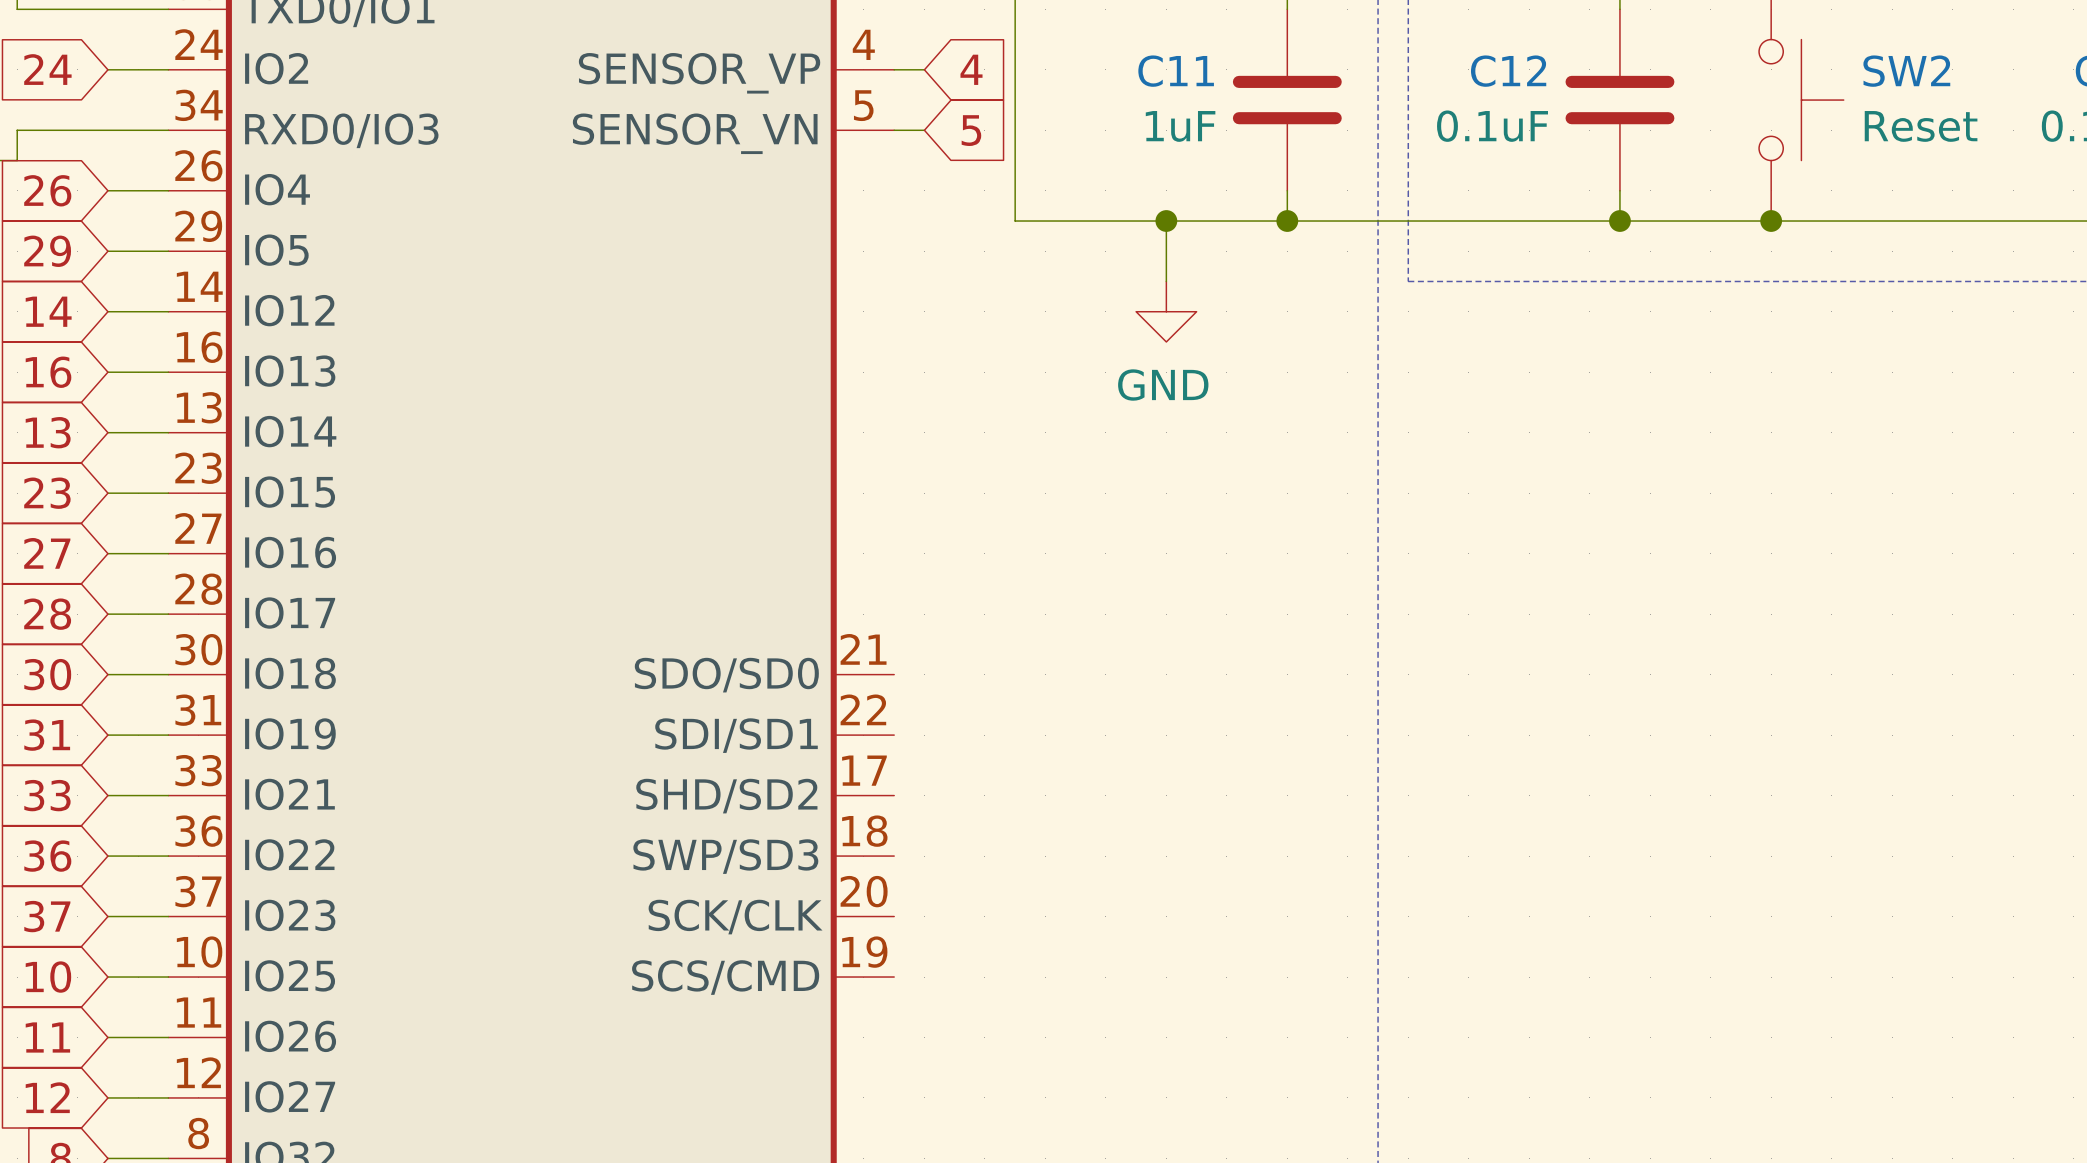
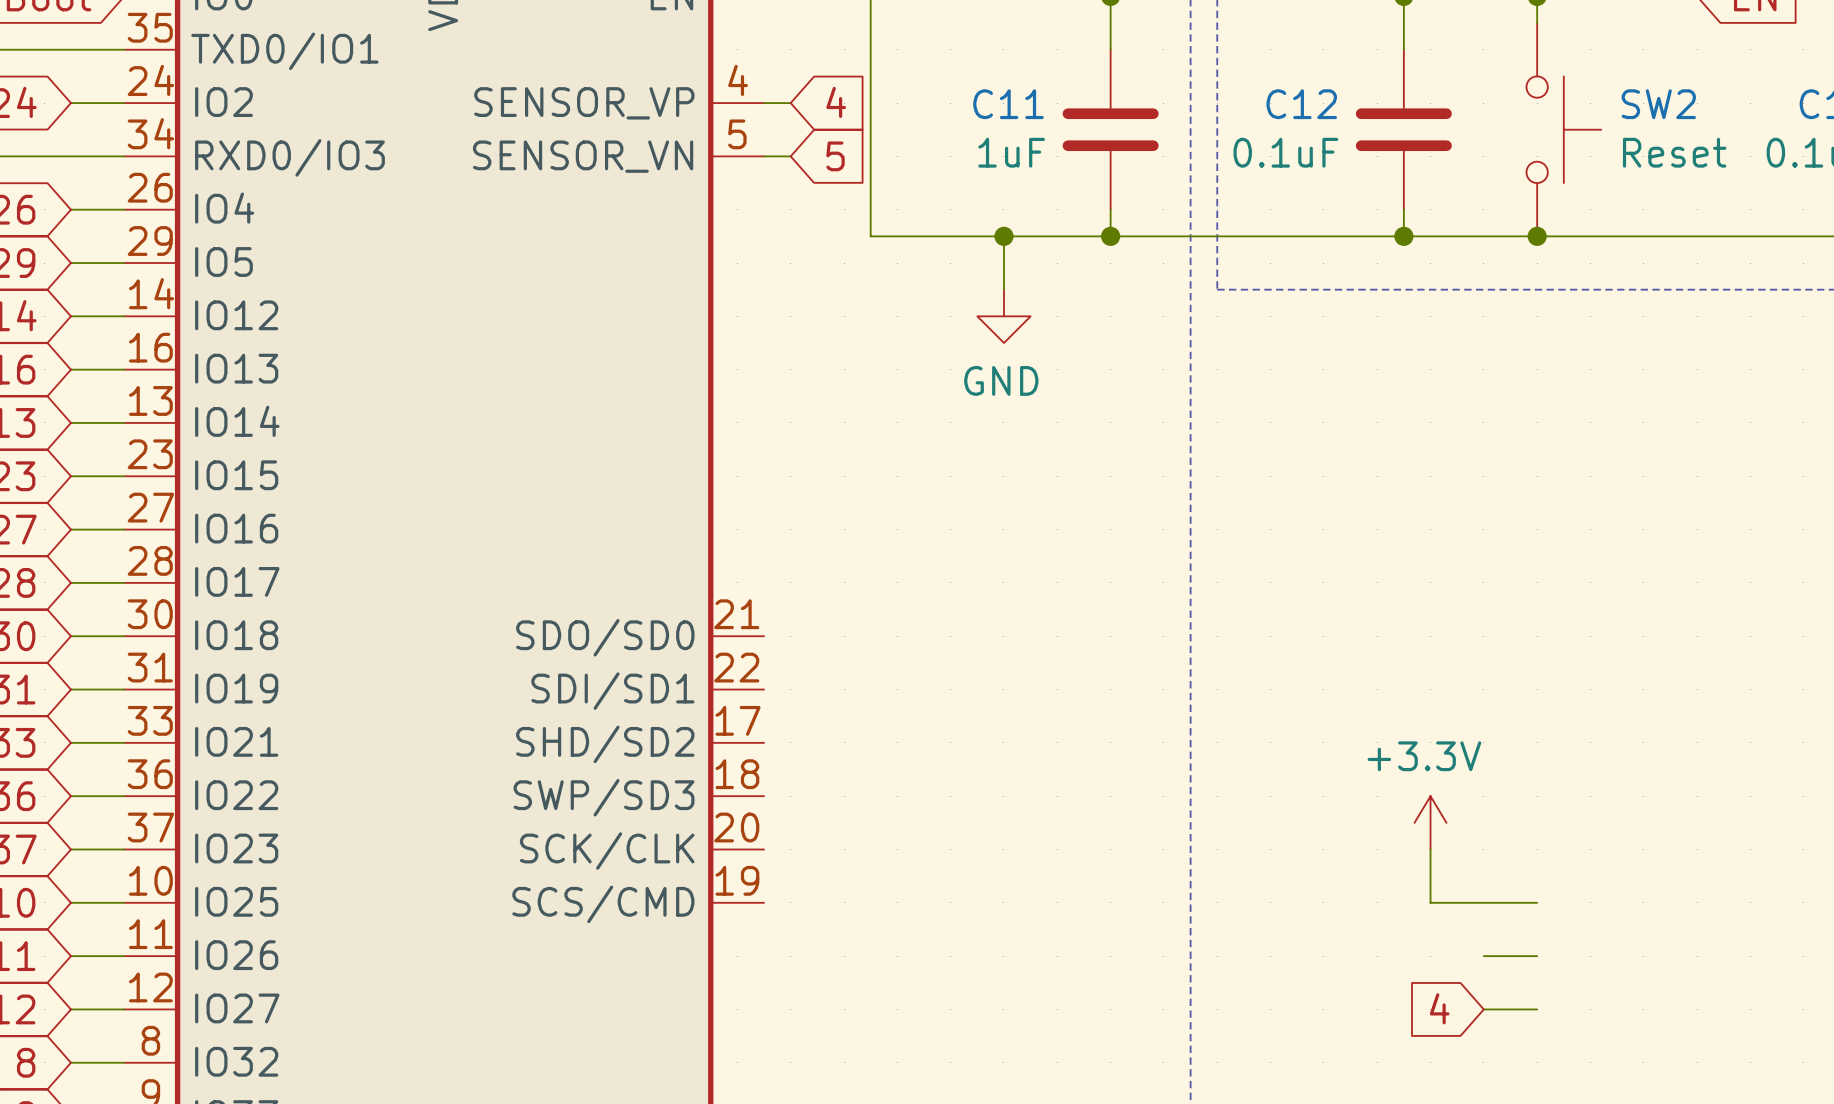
power symbol: none -> +3.3V (1430, 822)
wire: none -> (1430, 849) (1430, 902) (1537, 902)
wire: none -> (1483, 956) (1537, 956)
global label: none -> 4 (1439, 1008)
wire: none -> (1483, 1009) (1537, 1009)

